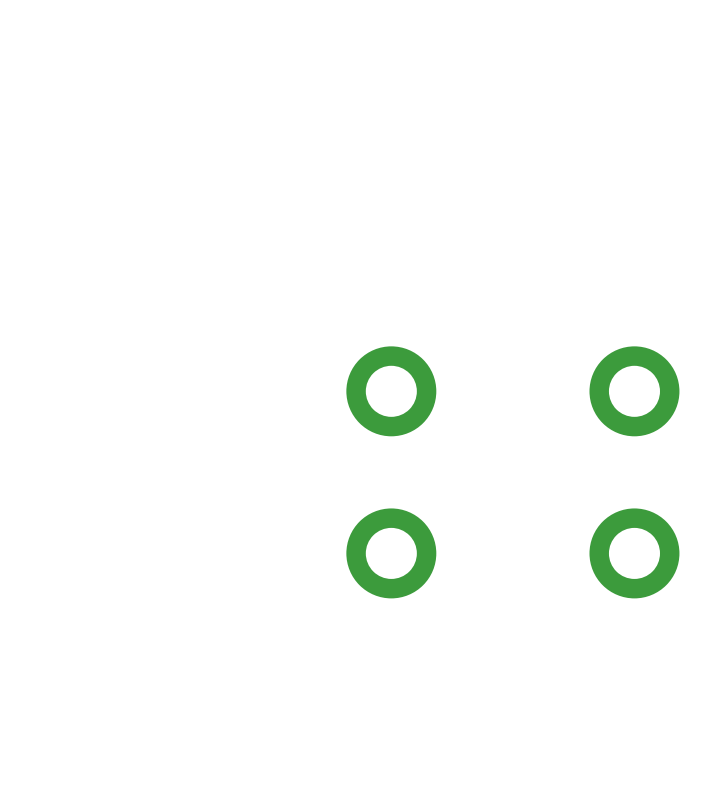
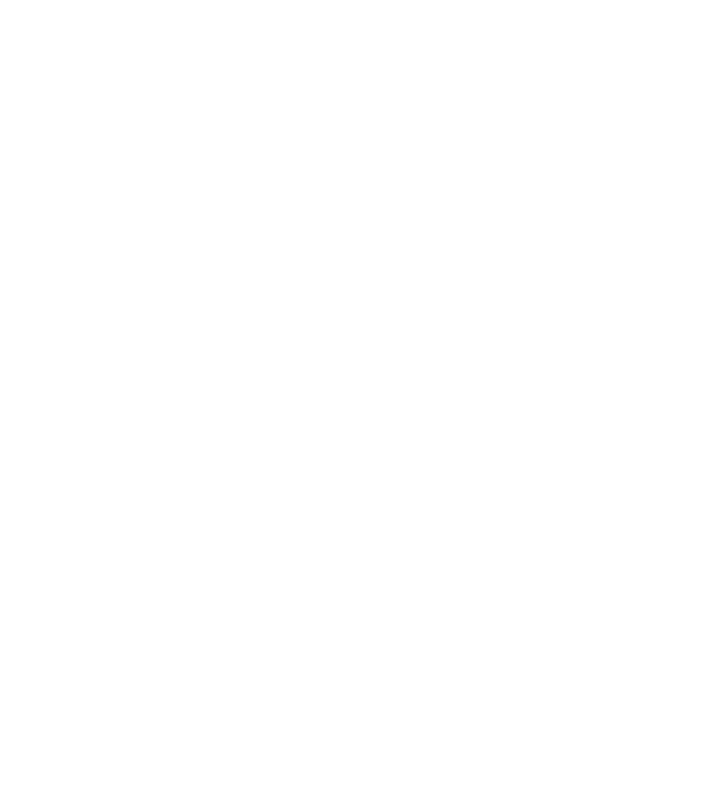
part: (391, 472) -> none
part: (634, 472) -> none

